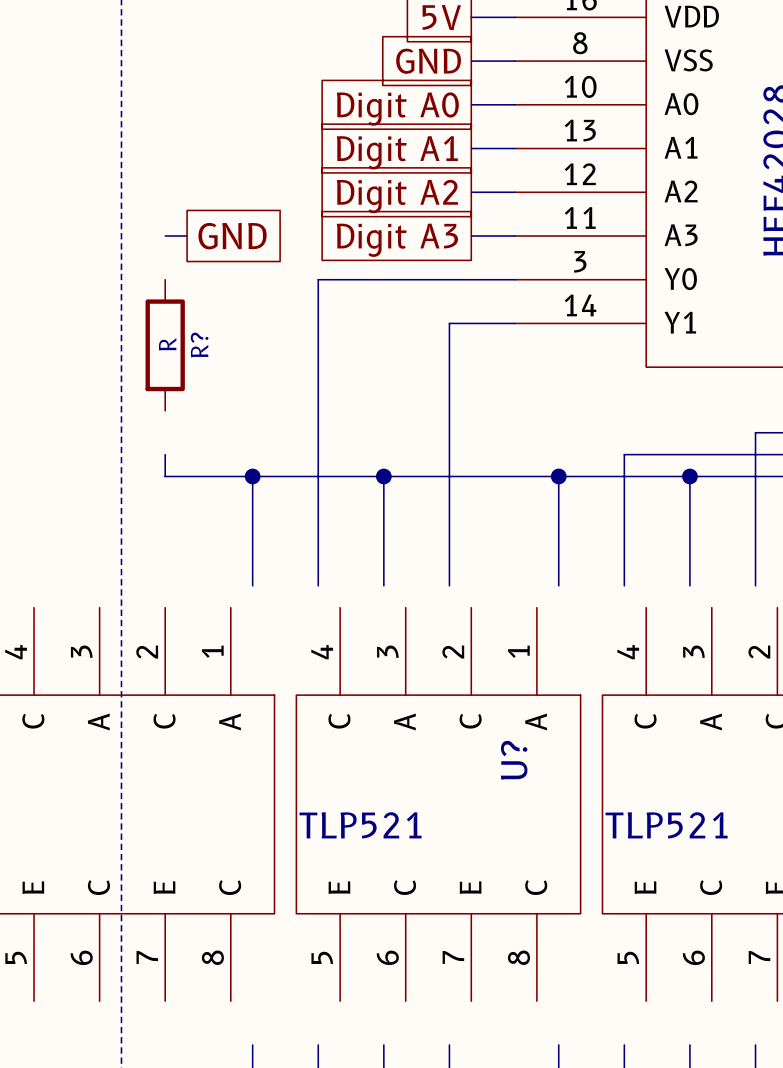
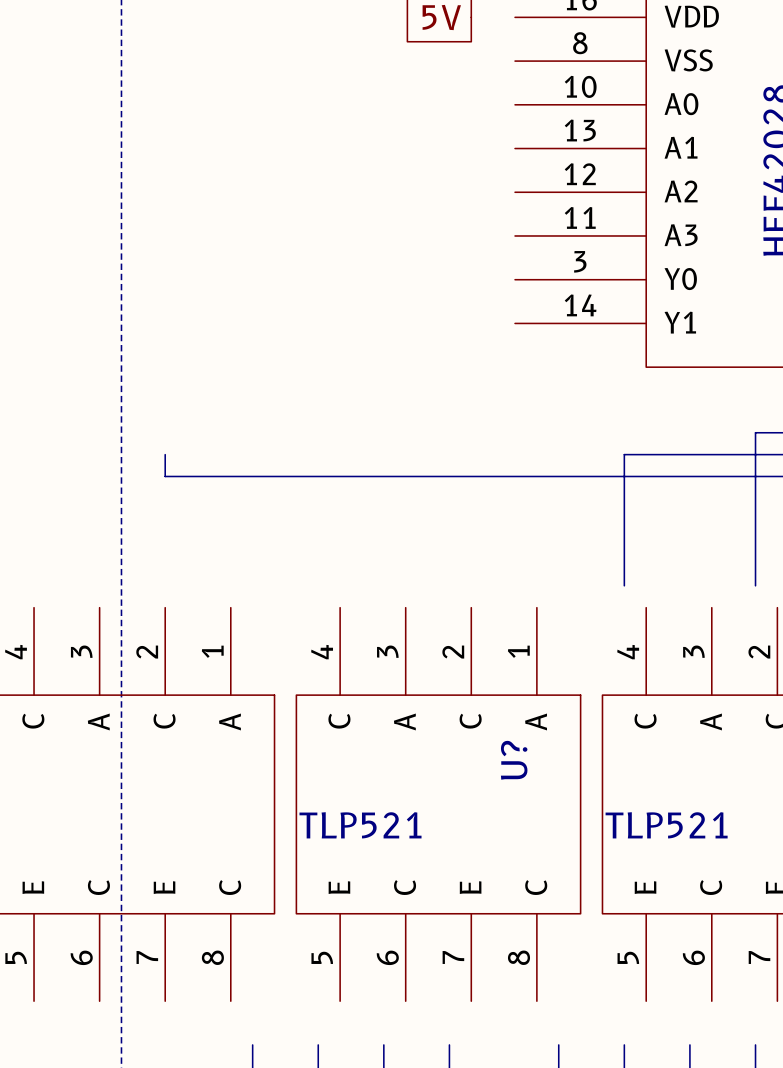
wire: (471, 17) (515, 17) -> none
global label: GND (428, 61) -> none
wire: (471, 61) (515, 61) -> none
wire: (471, 104) (515, 104) -> none
global label: Digit A0 (397, 109) -> none
wire: (471, 148) (515, 148) -> none
global label: Digit A1 (397, 152) -> none
wire: (471, 192) (515, 192) -> none
global label: Digit A2 (397, 196) -> none
wire: (165, 235) (187, 235) -> none
wire: (471, 235) (515, 235) -> none
global label: GND (232, 236) -> none
global label: Digit A3 (397, 240) -> none
wire: (515, 279) (318, 279) (318, 585) -> none
wire: (515, 323) (449, 323) (449, 585) -> none
R?: R (165, 345) -> none
wire: (252, 476) (252, 585) -> none
junction: (252, 476) -> none
wire: (383, 476) (383, 585) -> none
junction: (383, 476) -> none
wire: (558, 476) (558, 585) -> none
junction: (558, 476) -> none
wire: (689, 476) (689, 585) -> none
junction: (689, 476) -> none

